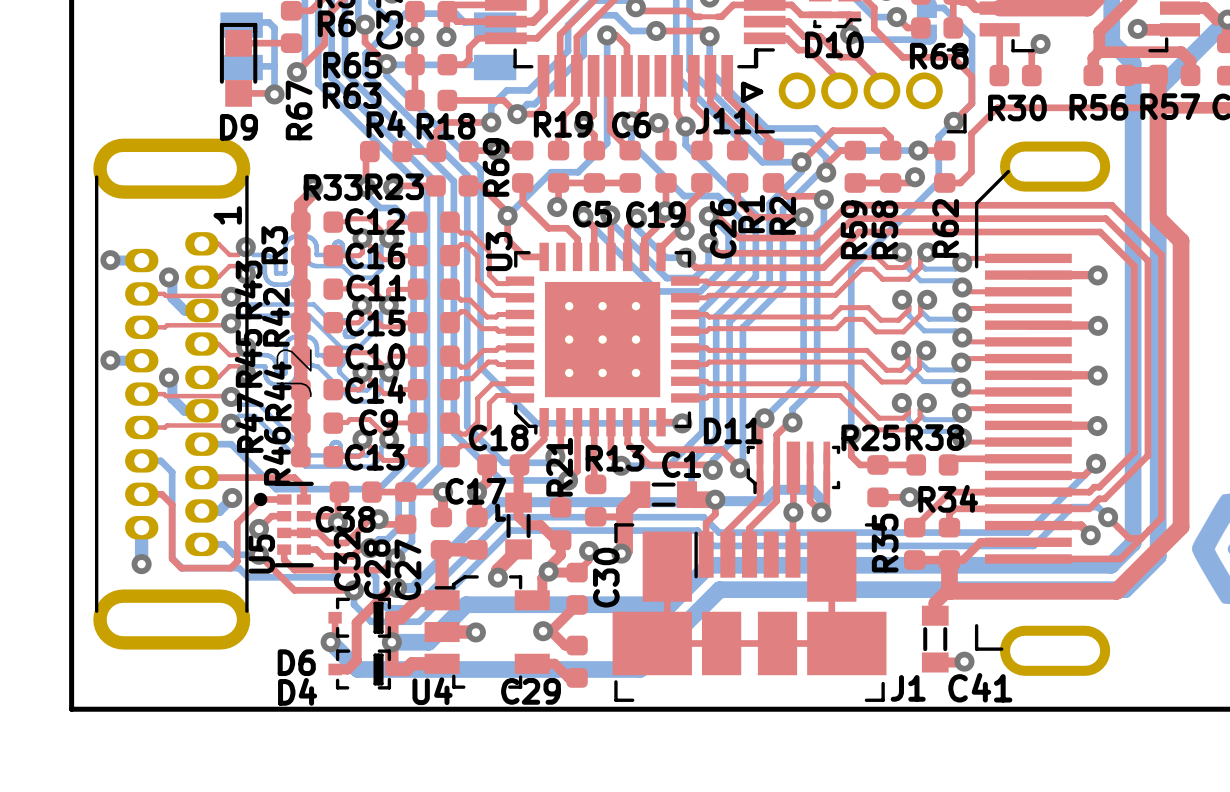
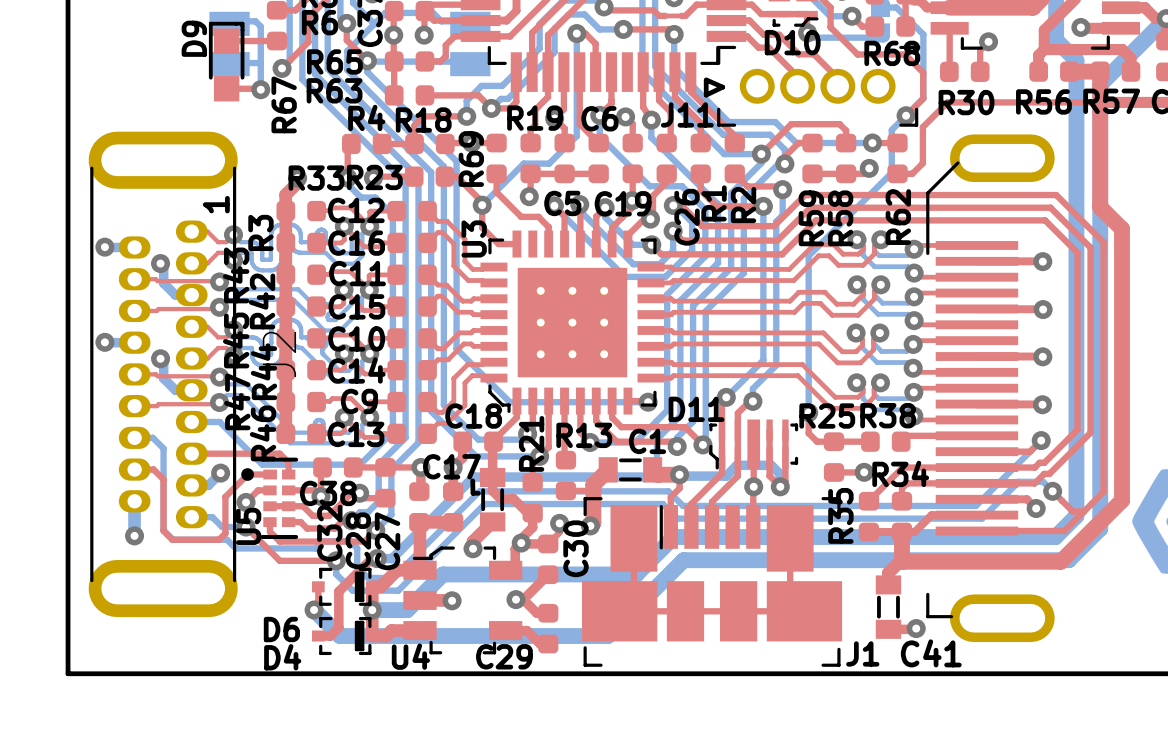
D9 name rotation: 0° (238, 127) -> 90° counterclockwise (194, 38)
D9 name position: D9 (238, 127) -> D9 (194, 38)

